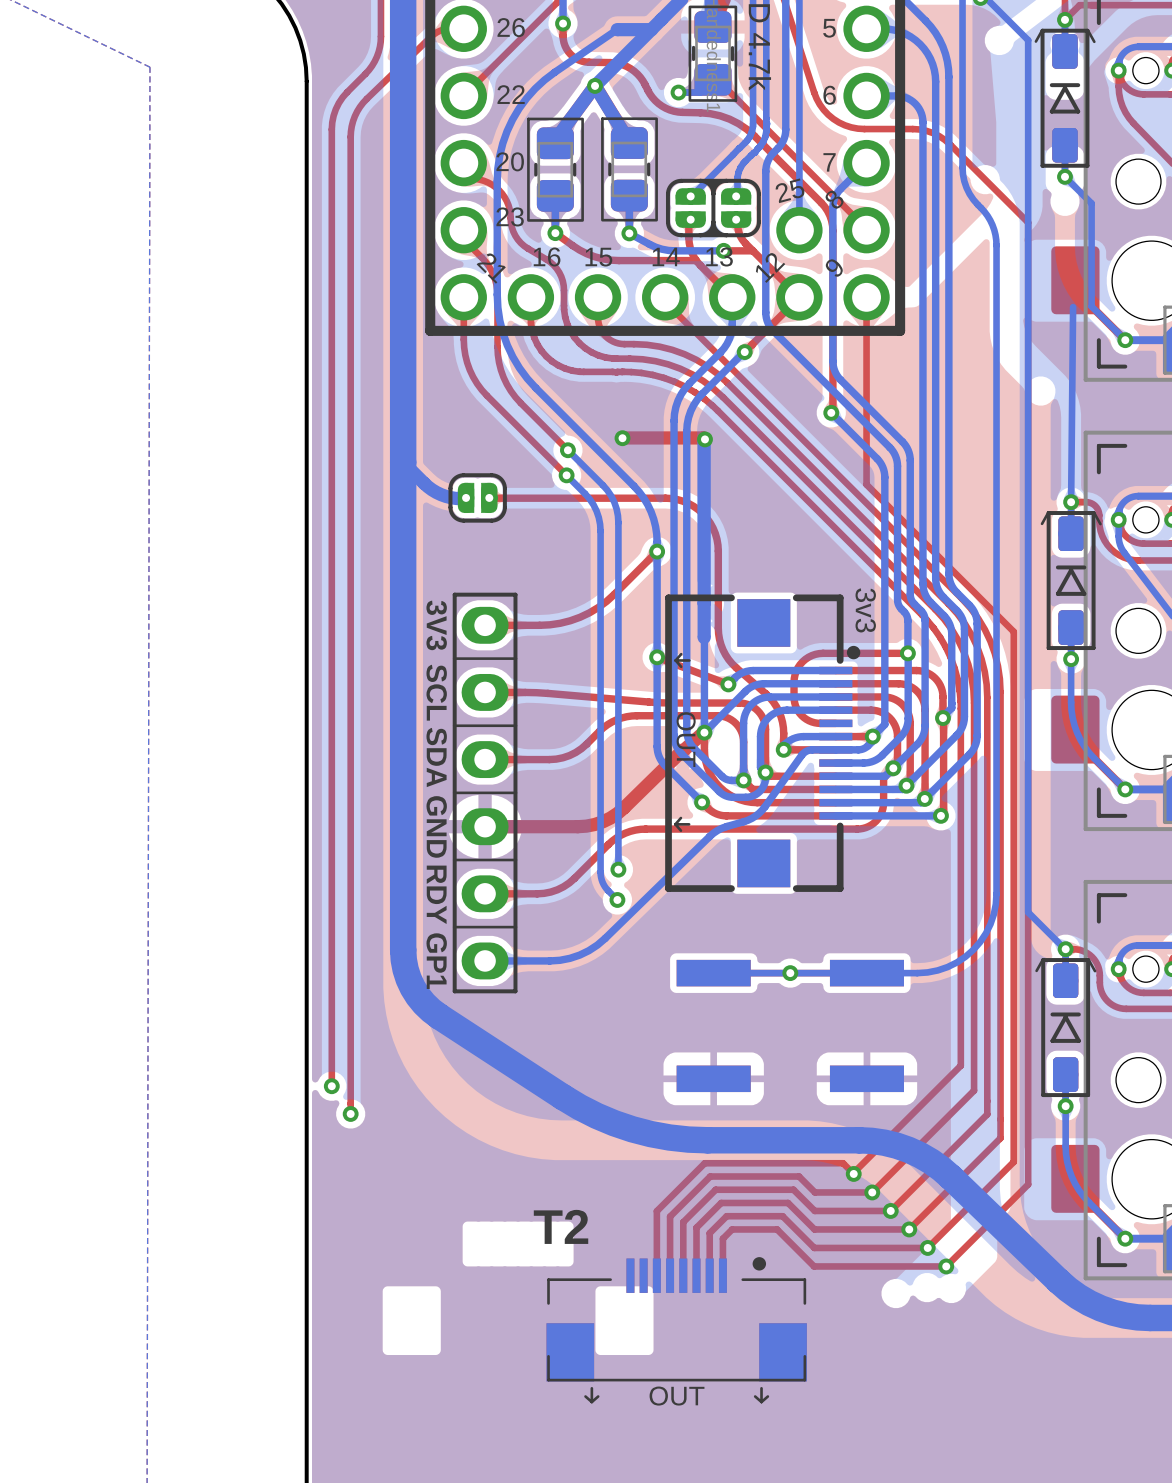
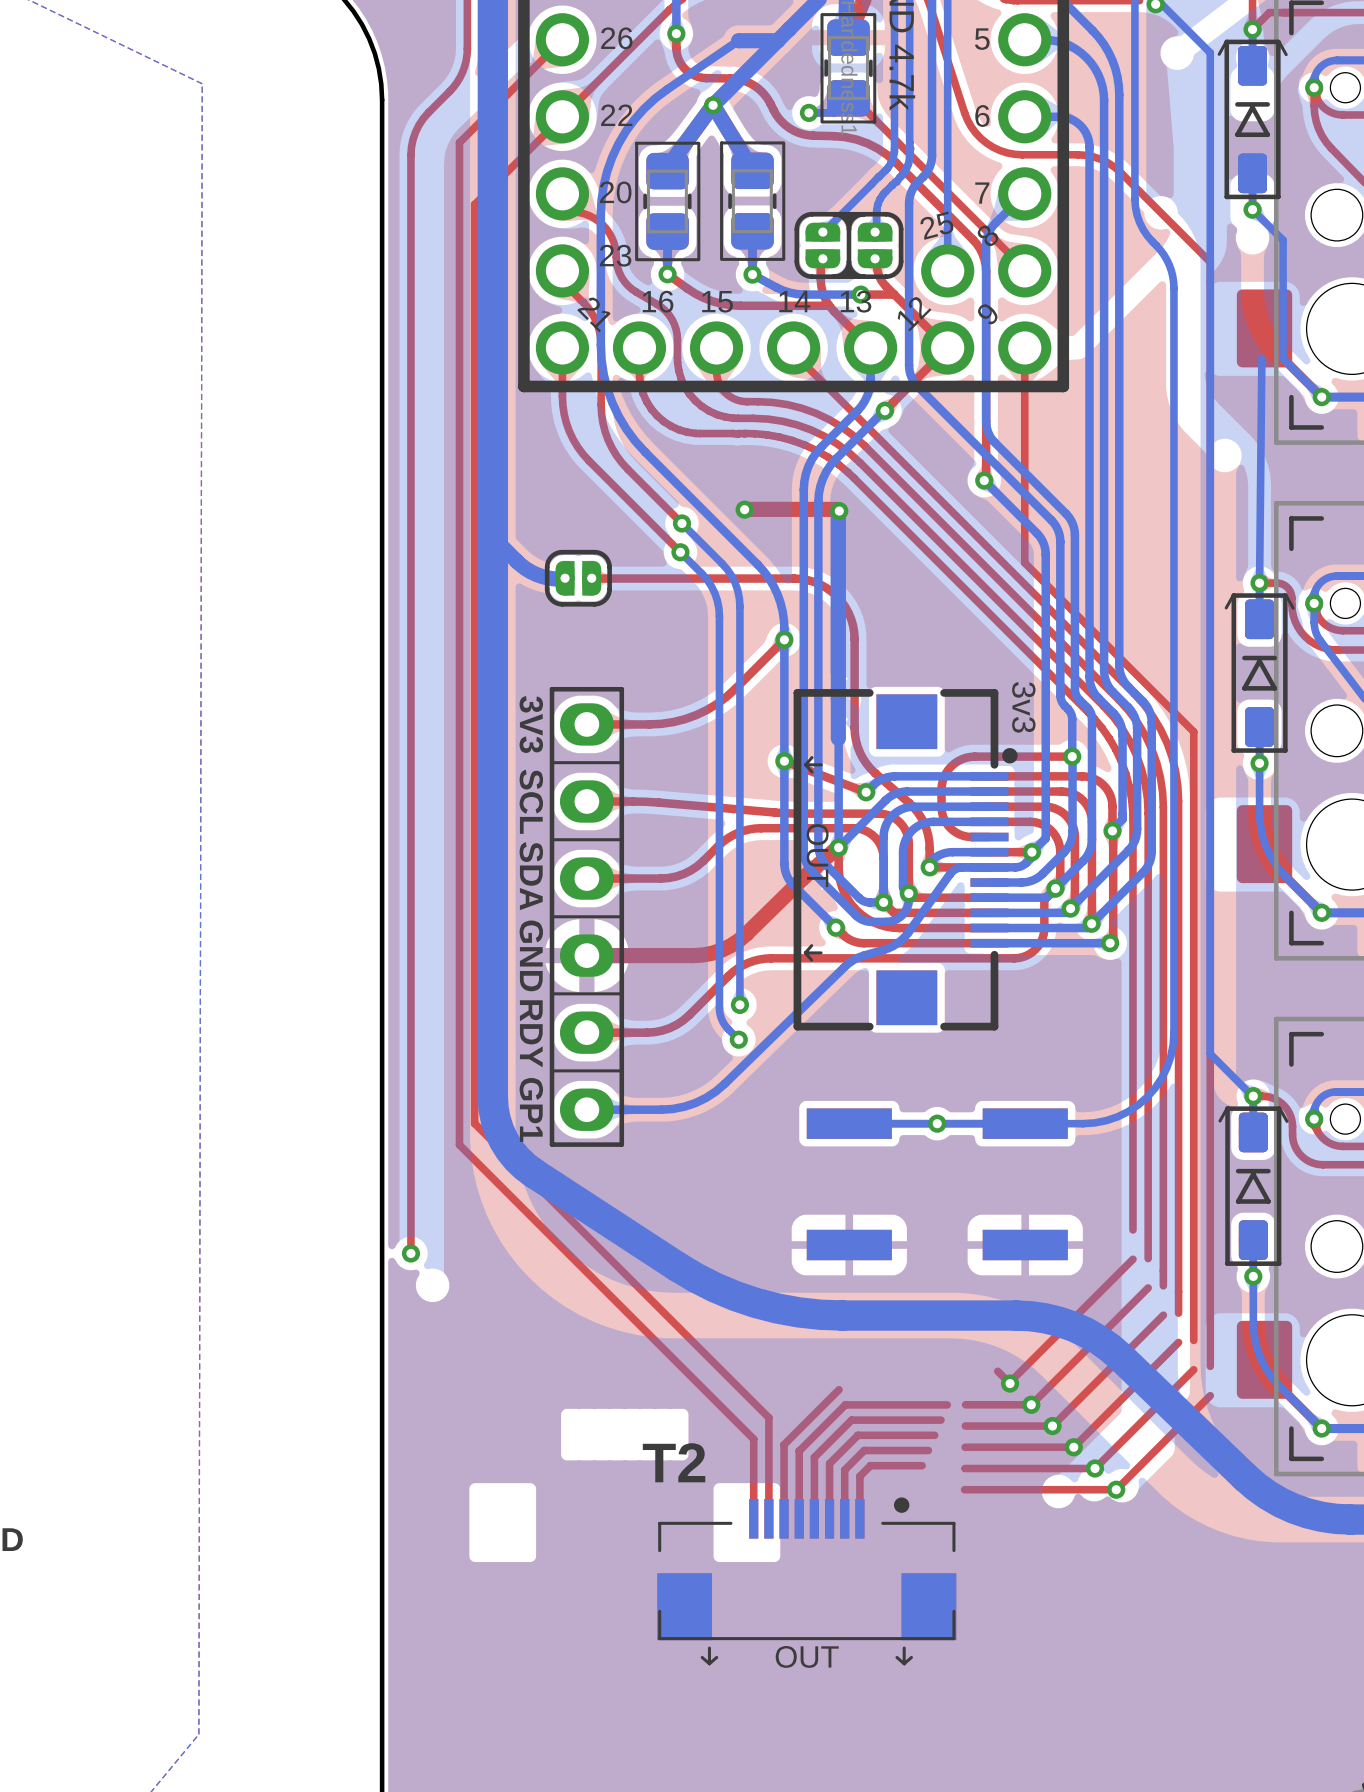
top track: (450, 28) (434, 34) (366, 98) (357, 111) (350, 131) (350, 1113) -> none
top track: none -> (562, 39) (459, 142) (459, 1144) (753, 1439) (753, 1518)
top track: none -> (562, 116) (474, 204) (474, 1123) (768, 1417) (768, 1518)
top track: (960, 1065) (853, 1173) (843, 1163) (704, 1163) (656, 1211) (656, 1252) -> (839, 1389) (784, 1444)
top track: (974, 1090) (872, 1192) (815, 1192) (799, 1176) (710, 1176) (670, 1216) (670, 1258) -> (947, 1404) (845, 1404) (799, 1451)
top track: none -> (1132, 1259) (1010, 1383) (997, 1371)
via: (350, 1113) -> none
top track: (987, 1114) (890, 1210) (814, 1210) (793, 1189) (715, 1189) (683, 1222) (683, 1263) -> (940, 1420) (851, 1420) (814, 1457)
top track: none -> (1148, 1287) (1031, 1404) (965, 1404)
top track: (1000, 1138) (909, 1229) (814, 1229) (788, 1202) (721, 1202) (696, 1227) (696, 1269) -> (934, 1435) (857, 1435) (829, 1463)
top track: none -> (1163, 1315) (1052, 1426) (965, 1426)
top track: (1013, 1161) (927, 1247) (814, 1247) (782, 1216) (726, 1216) (709, 1233) (709, 1274) -> (928, 1450) (864, 1450) (844, 1470)
top track: none -> (1178, 1342) (1073, 1447) (965, 1447)
via: (853, 1173) -> none
top track: (1028, 1184) (946, 1266) (814, 1266) (777, 1229) (732, 1229) (722, 1238) (722, 1275) -> none
top track: none -> (1193, 1369) (1095, 1468) (964, 1468)
via: (872, 1192) -> none
via: none -> (1010, 1383)
via: (890, 1210) -> none
top track: none -> (1210, 1395) (1116, 1489) (964, 1489)
via: none -> (1031, 1404)
via: (909, 1229) -> none
via: none -> (1052, 1426)
via: (927, 1247) -> none
via: none -> (1073, 1447)
via: (946, 1266) -> none
top track: none -> (922, 1465) (870, 1465) (859, 1476) (859, 1518)
via: none -> (1095, 1468)
top track: none -> (784, 1471) (784, 1518)
top track: none -> (799, 1471) (799, 1518)
top track: none -> (814, 1471) (814, 1518)
top track: none -> (829, 1471) (829, 1518)
top track: none -> (844, 1471) (844, 1518)
via: none -> (1116, 1489)
T2 position: (676, 1330) -> (806, 1581)

